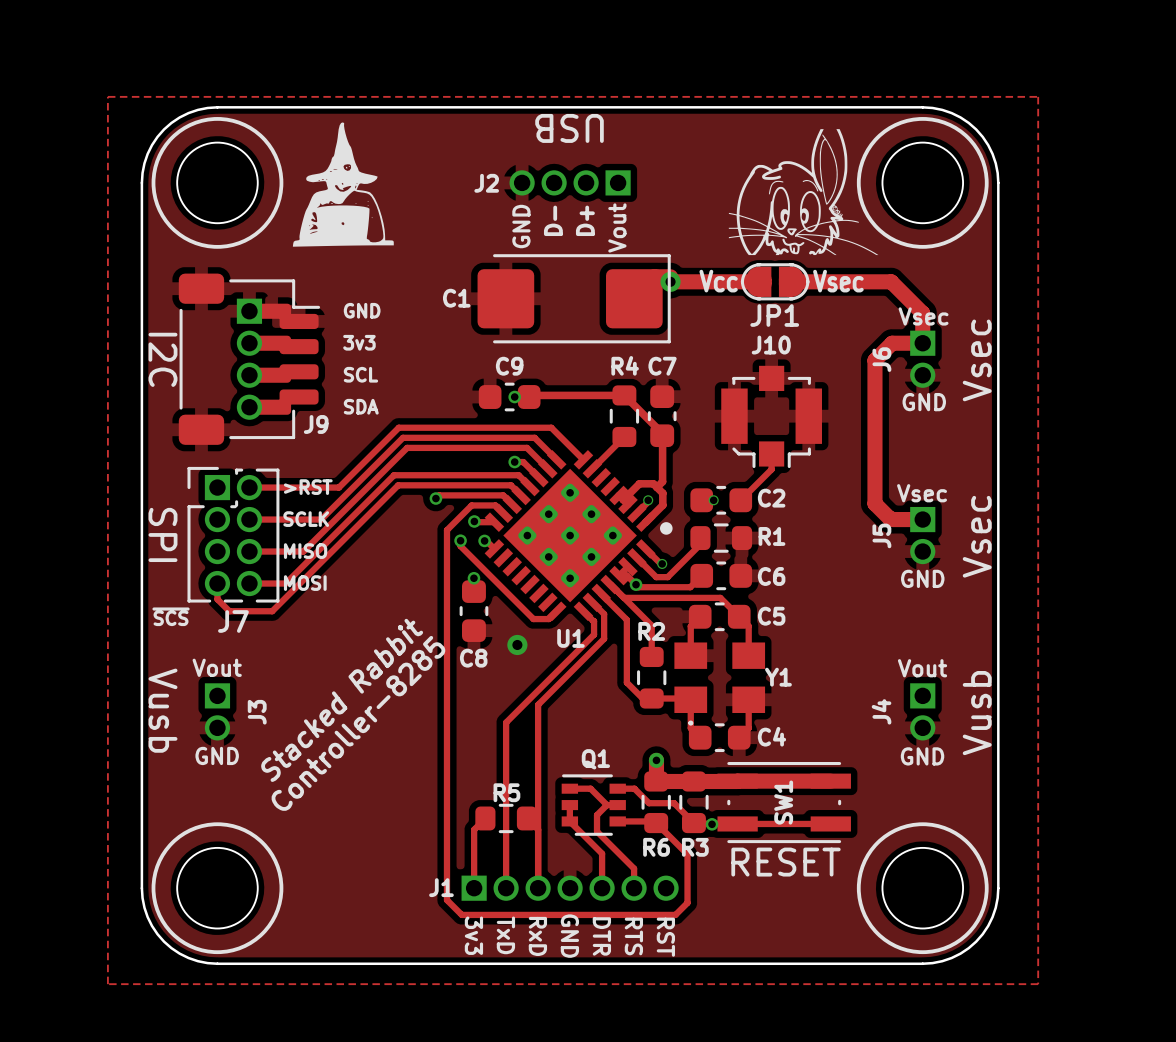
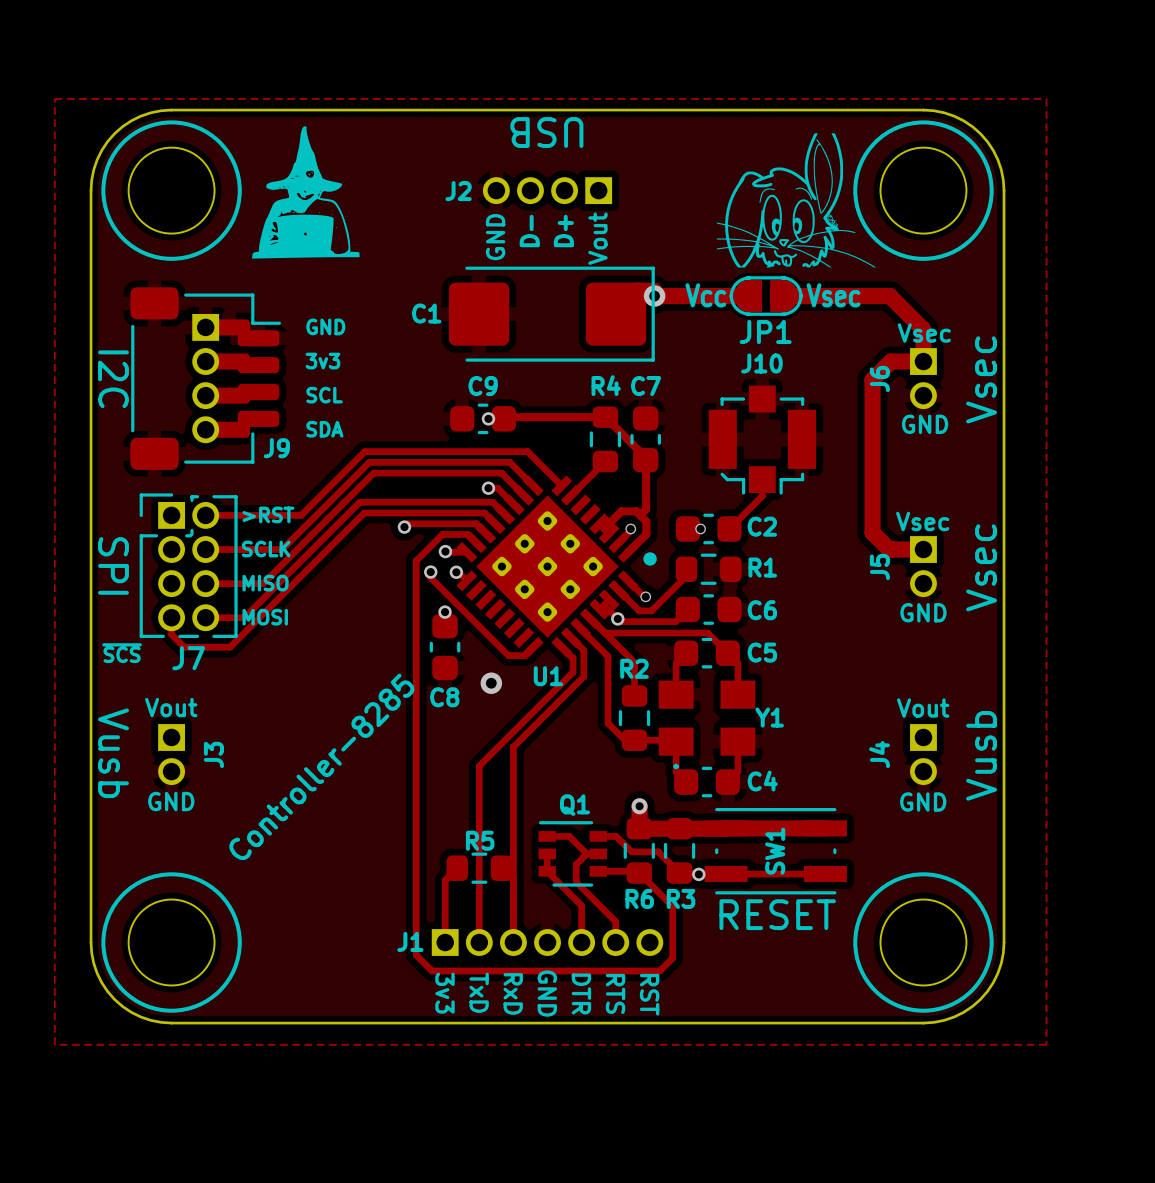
text: Stacked Rabbit (342, 700) -> none

